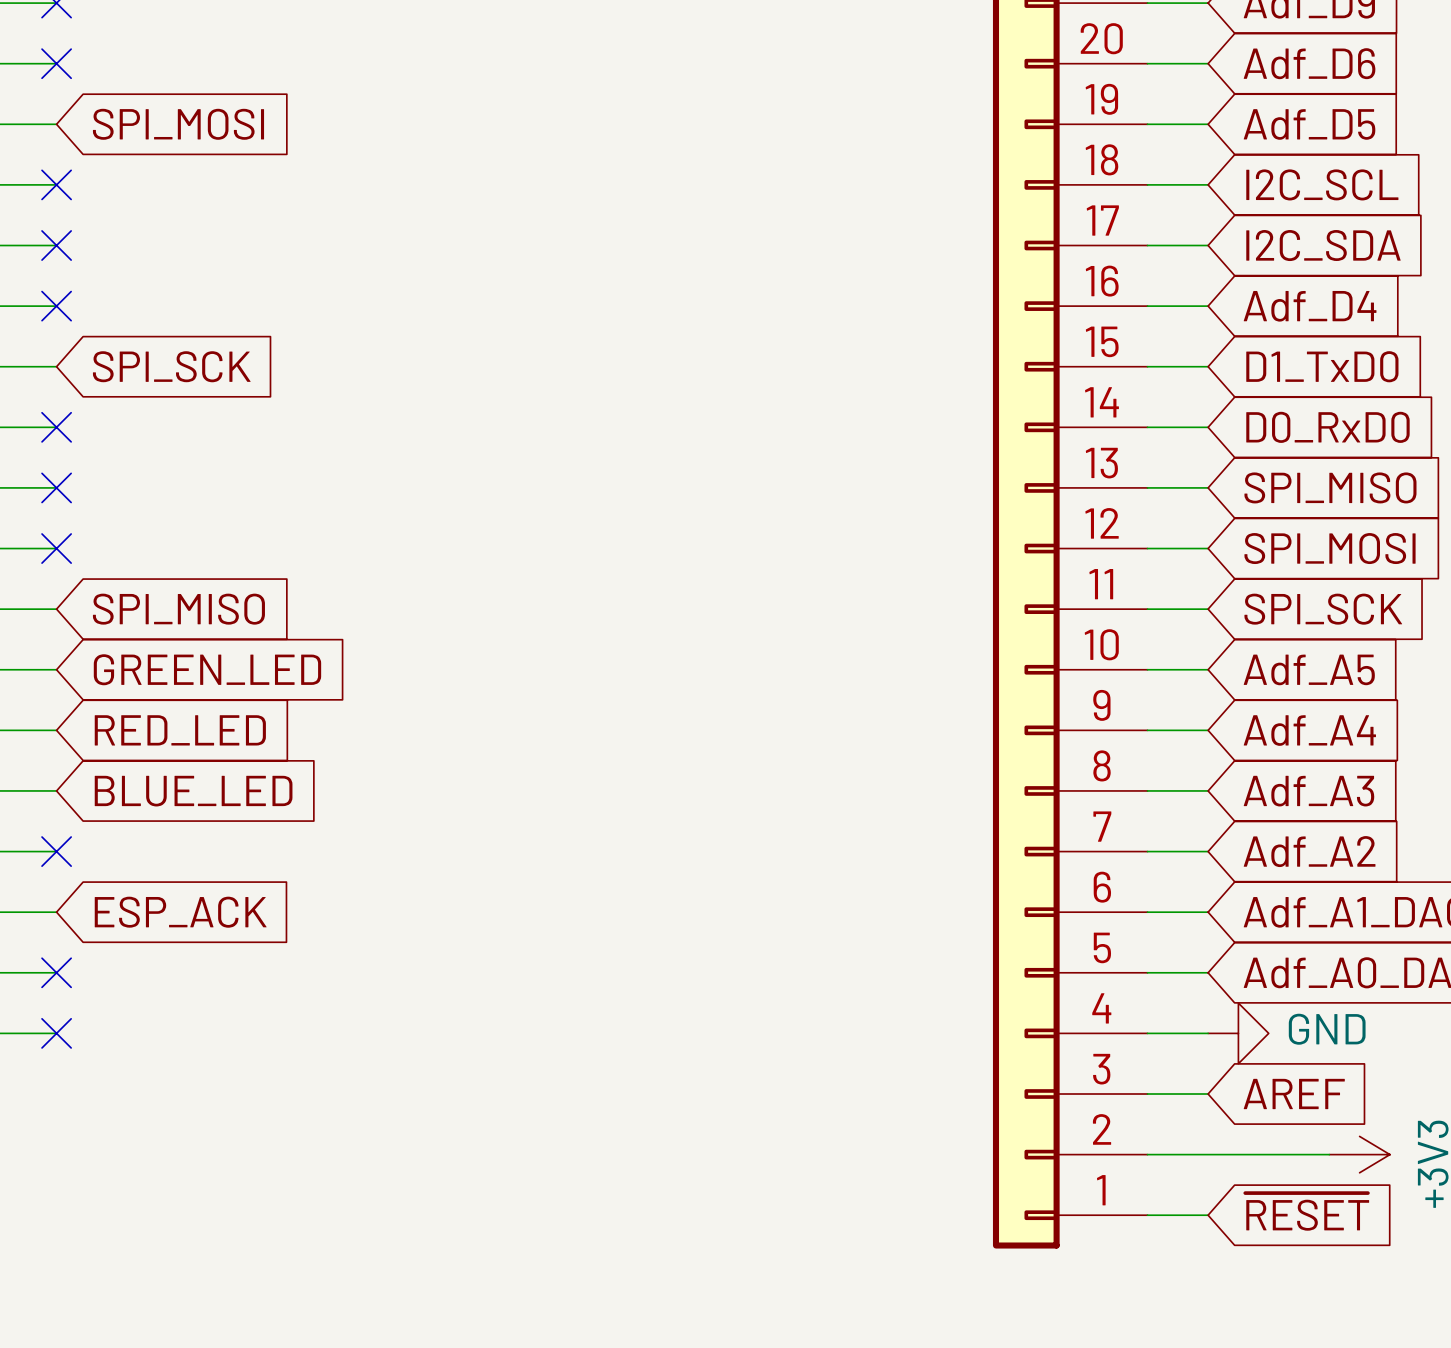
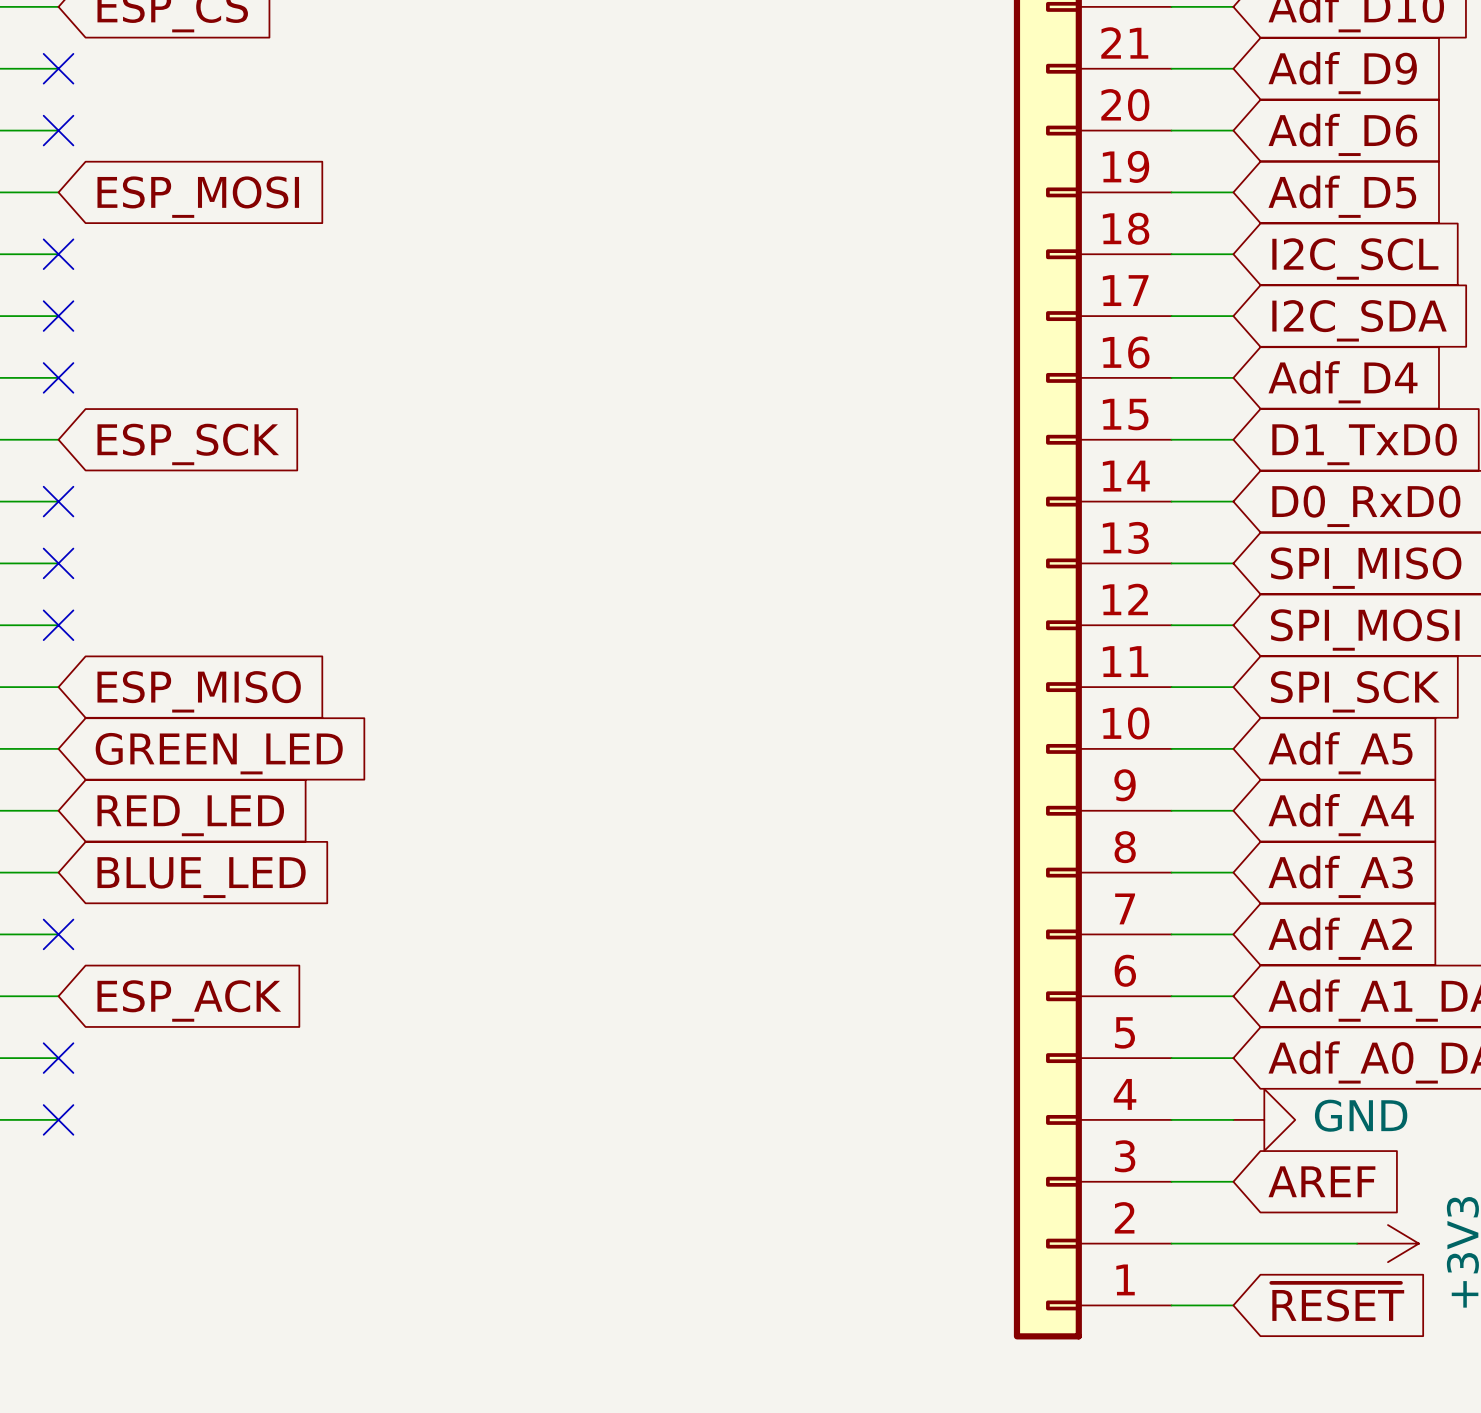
global label: SPI_MOSI (178, 124) -> ESP_MOSI (198, 197)
global label: SPI_SCK (171, 366) -> ESP_SCK (188, 444)
global label: SPI_MISO (178, 609) -> ESP_MISO (199, 691)

